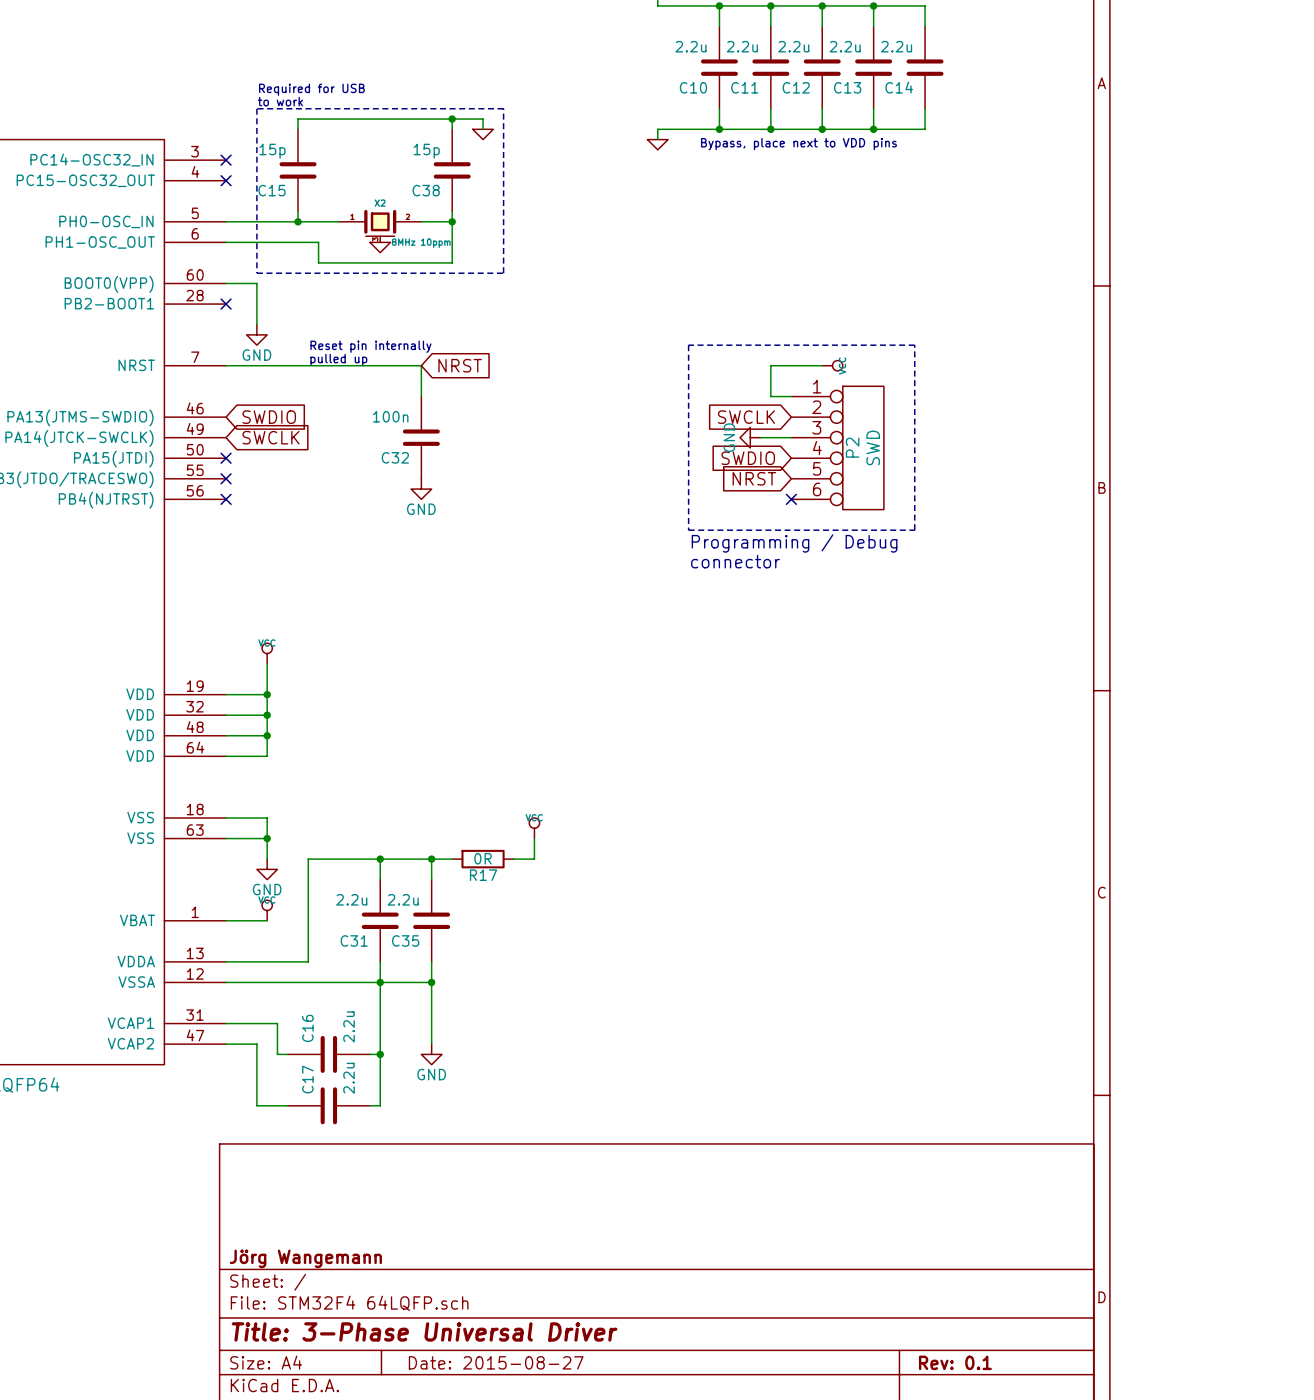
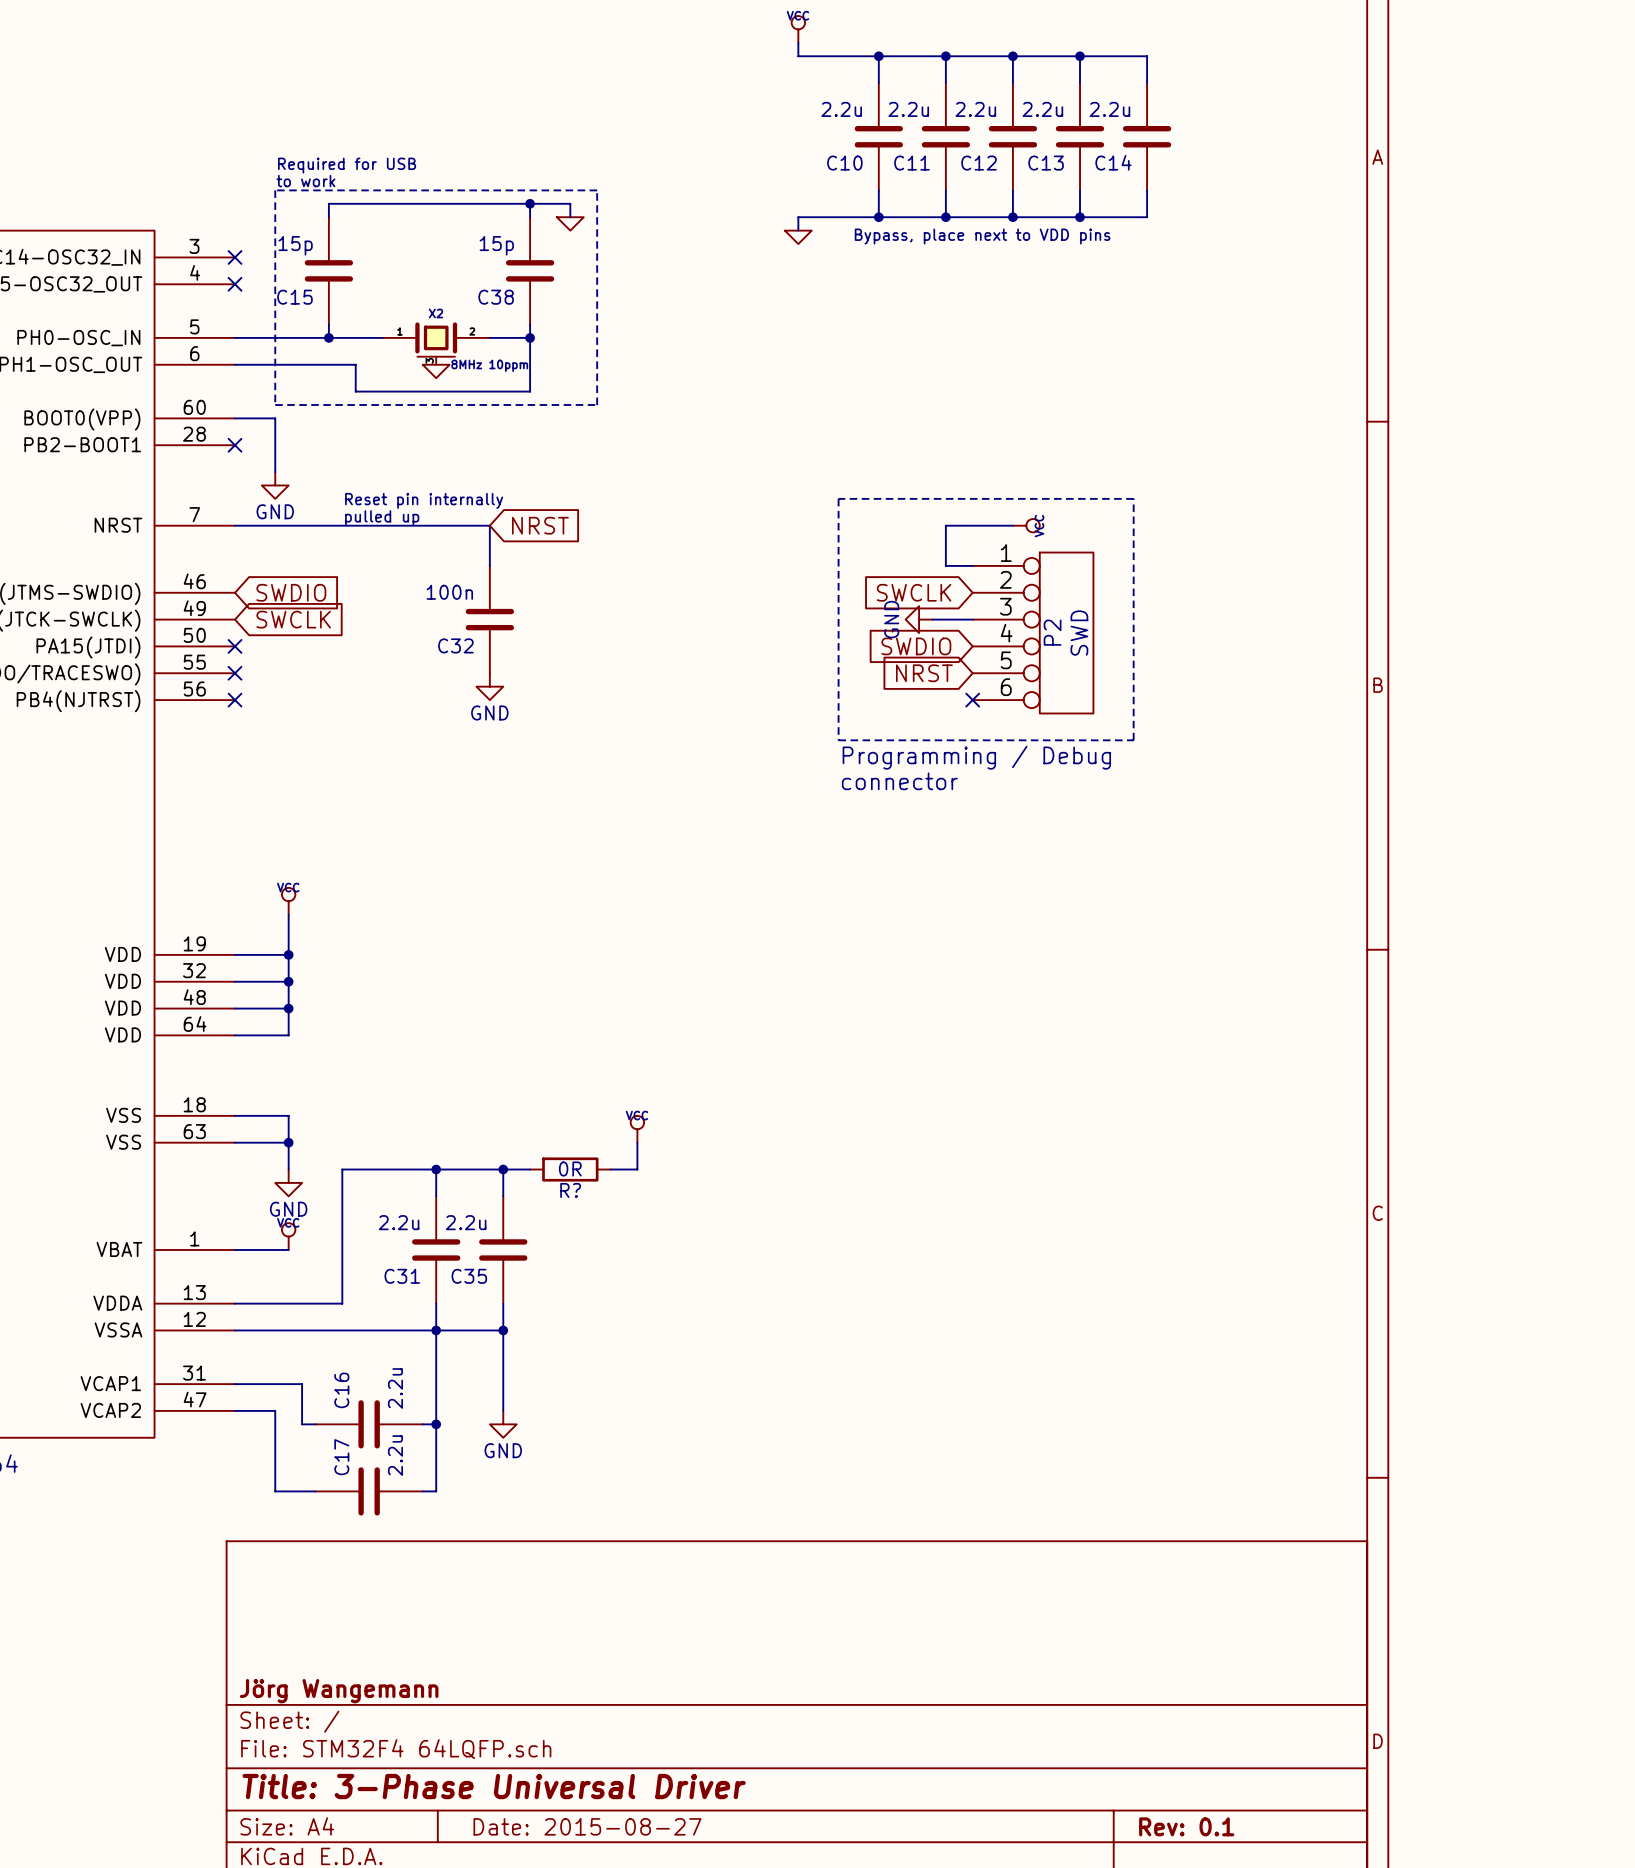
R17 name: R17 (483, 875) -> R? (570, 1190)

